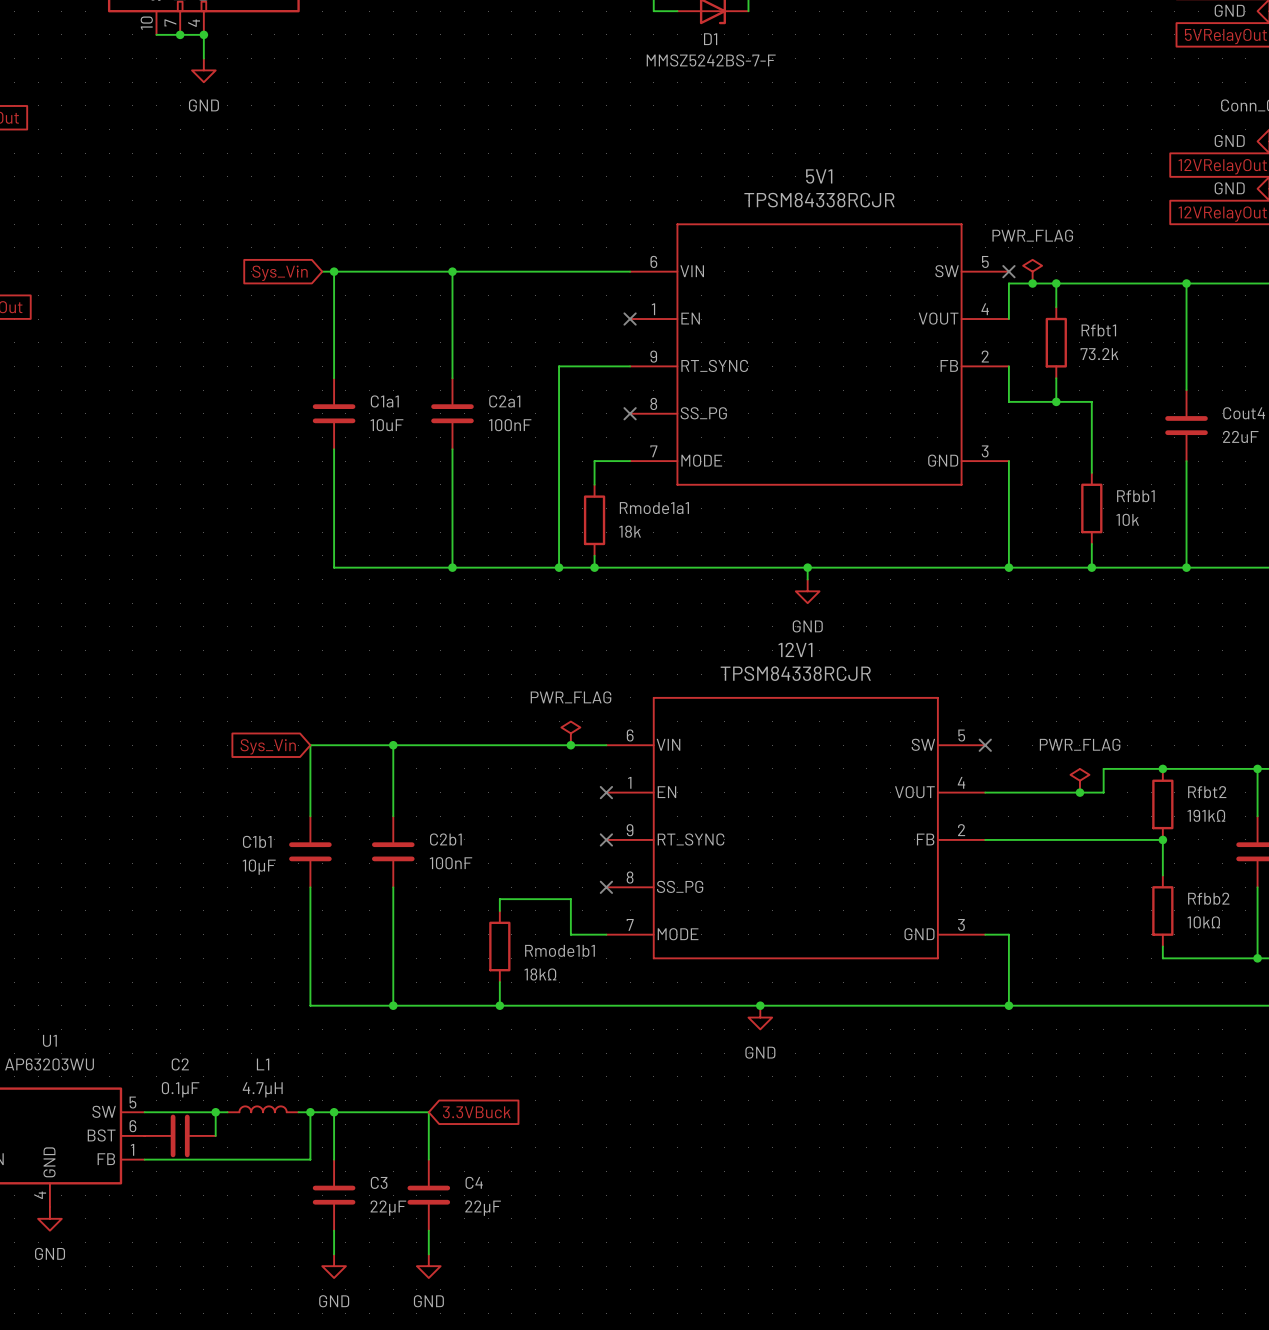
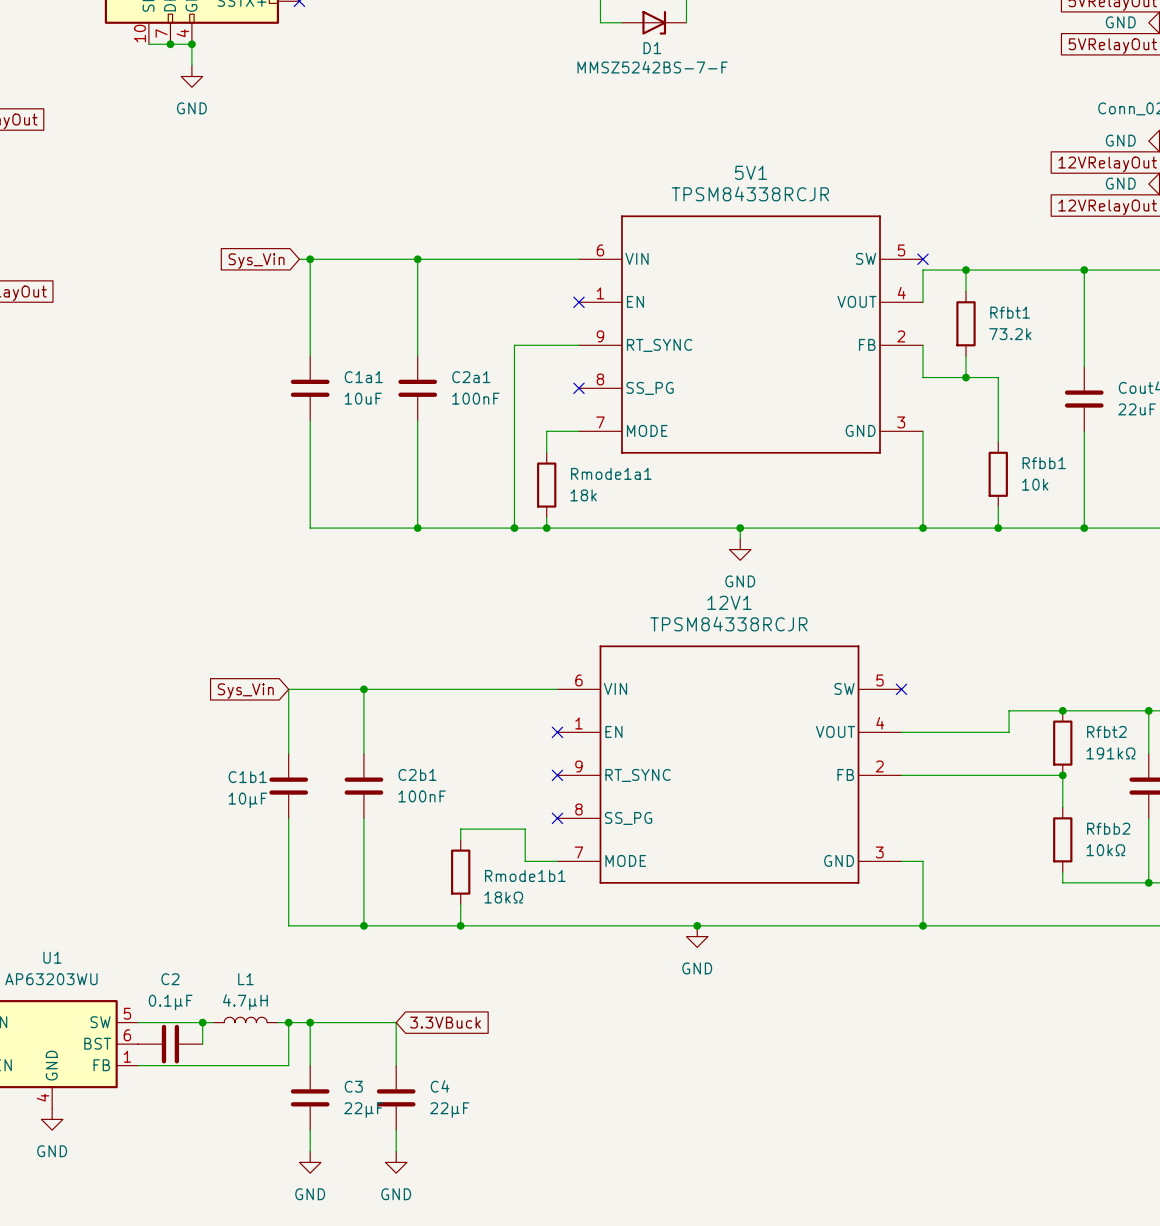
power symbol: PWR_FLAG (1032, 271) -> none
junction: (1032, 283) -> none
power symbol: PWR_FLAG (570, 733) -> none
junction: (570, 745) -> none
power symbol: PWR_FLAG (1079, 780) -> none
junction: (1079, 792) -> none

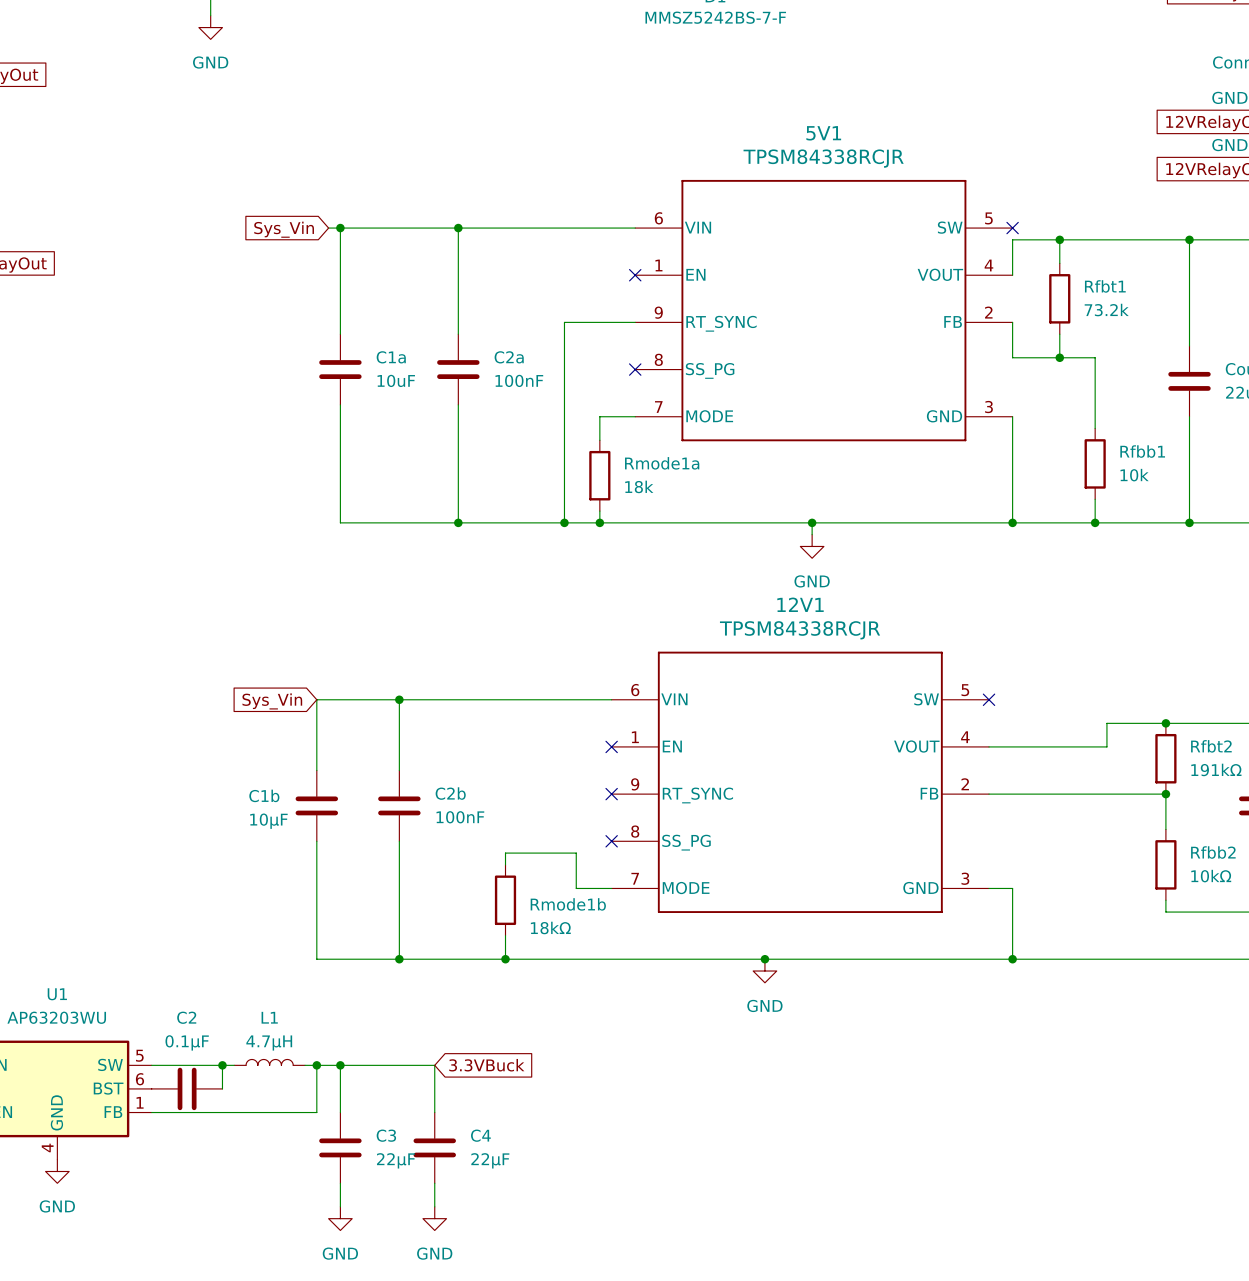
C1a1 name: C1a1 (363, 377) -> C1a (391, 357)
C2a1 name: C2a1 (471, 377) -> C2a (509, 357)
Rmode1a1 name: Rmode1a1 (611, 473) -> Rmode1a (662, 463)
C2b1 name: C2b1 (417, 774) -> C2b (450, 793)
C1b1 name: C1b1 (247, 777) -> C1b (264, 795)
Rmode1b1 name: Rmode1b1 (525, 876) -> Rmode1b (568, 904)

